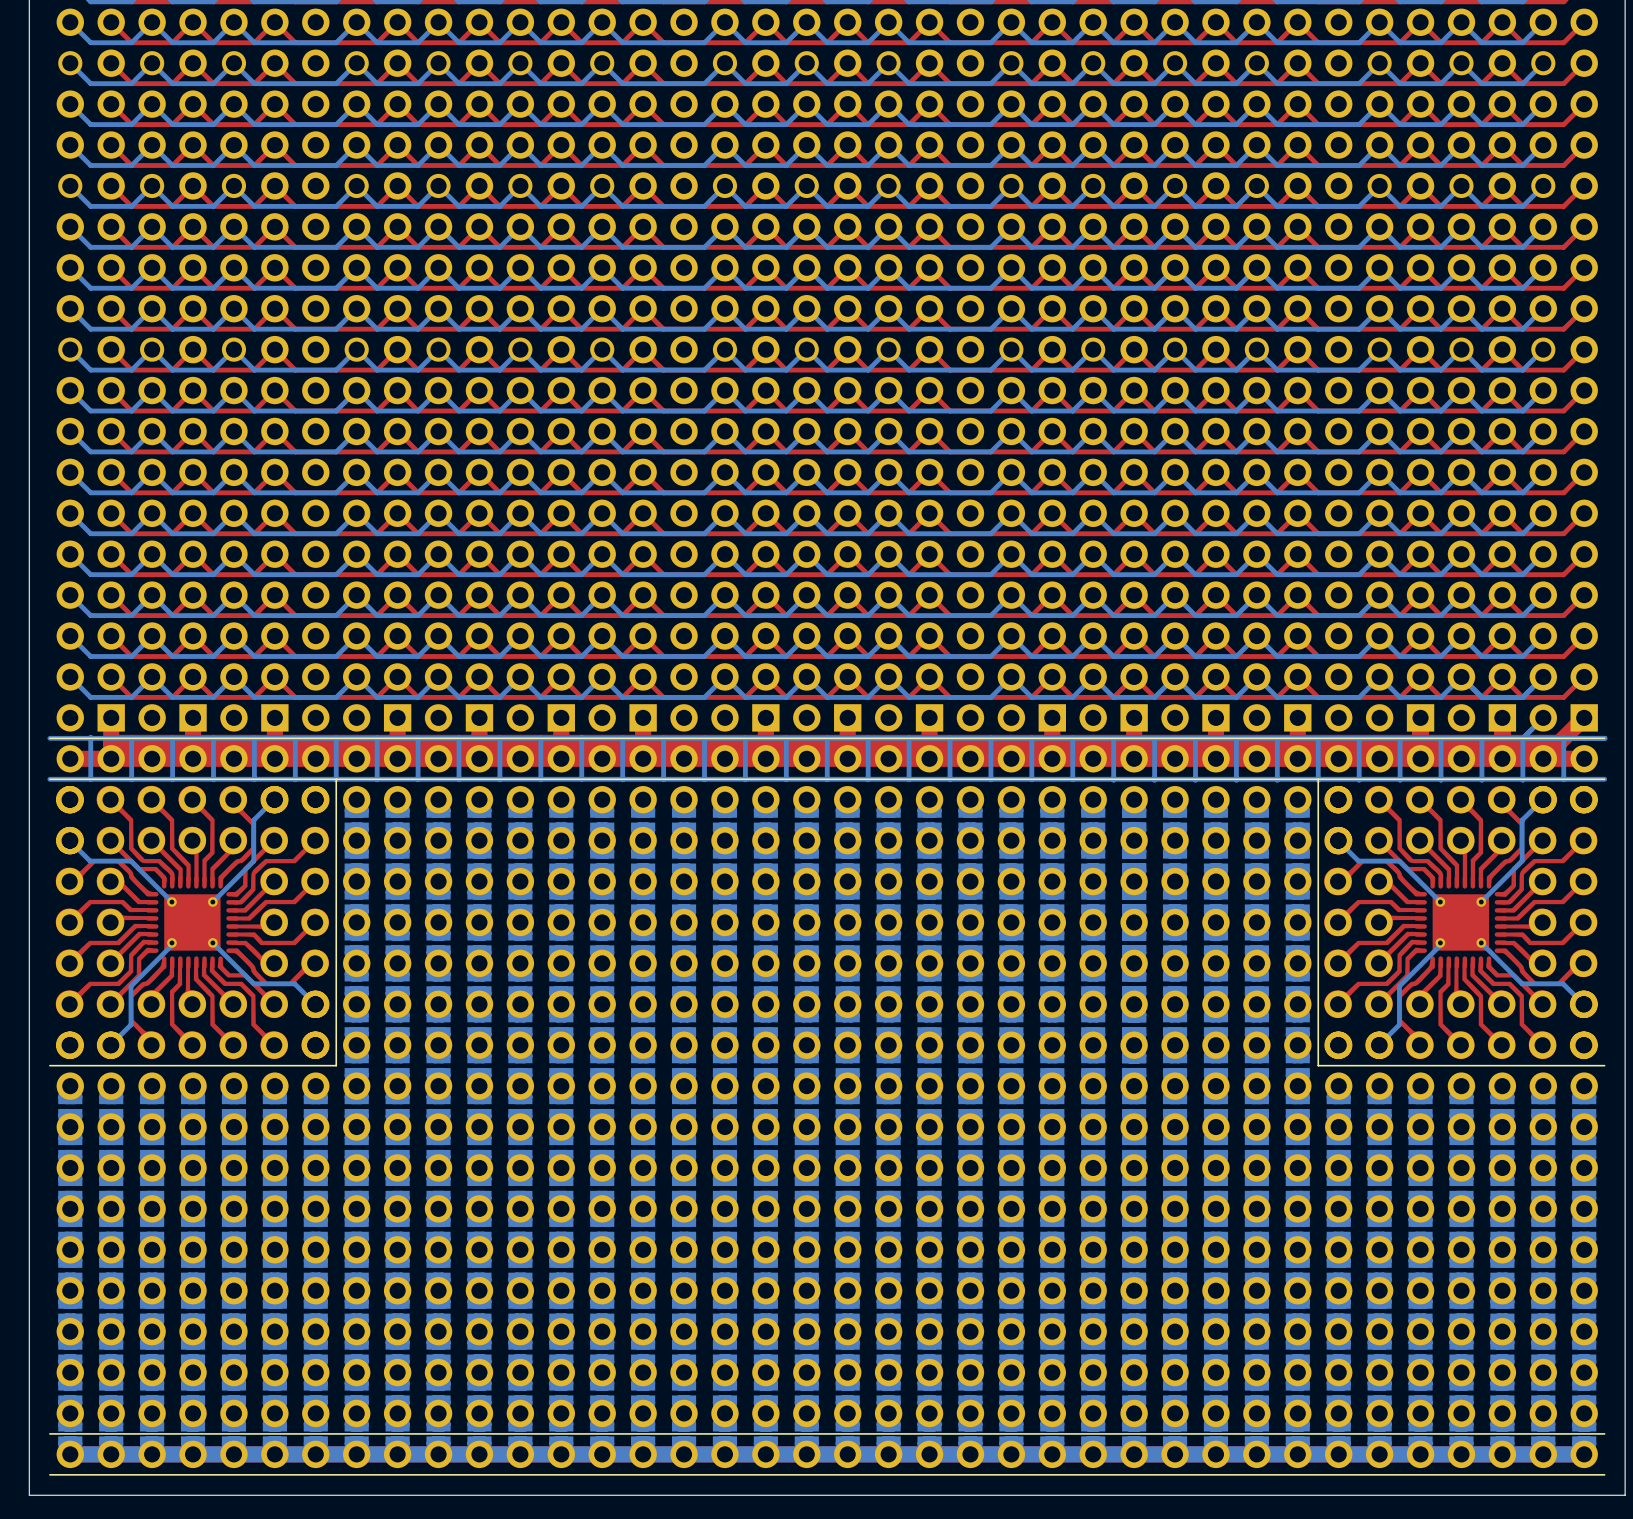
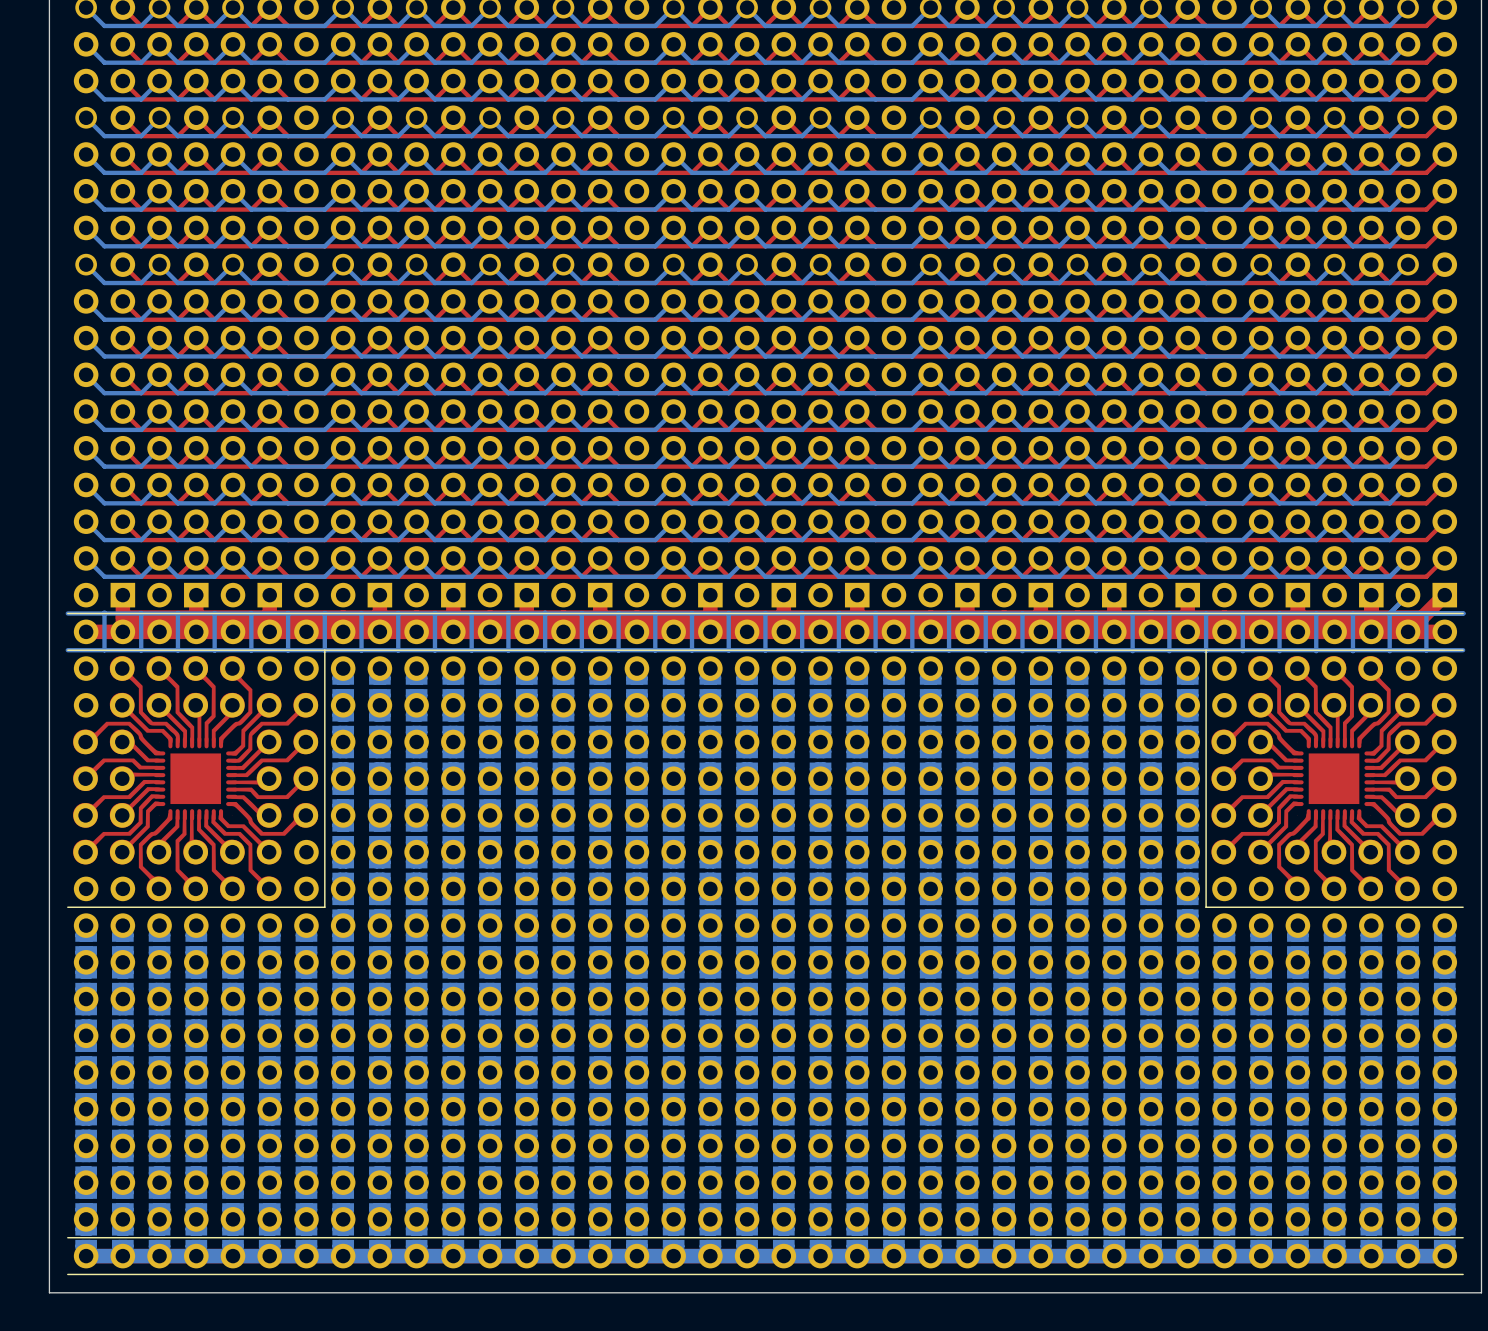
part footprint: [55, 785, 329, 1059] -> [73, 656, 319, 902]
part footprint: [1324, 785, 1598, 1059] -> [1211, 656, 1457, 902]

